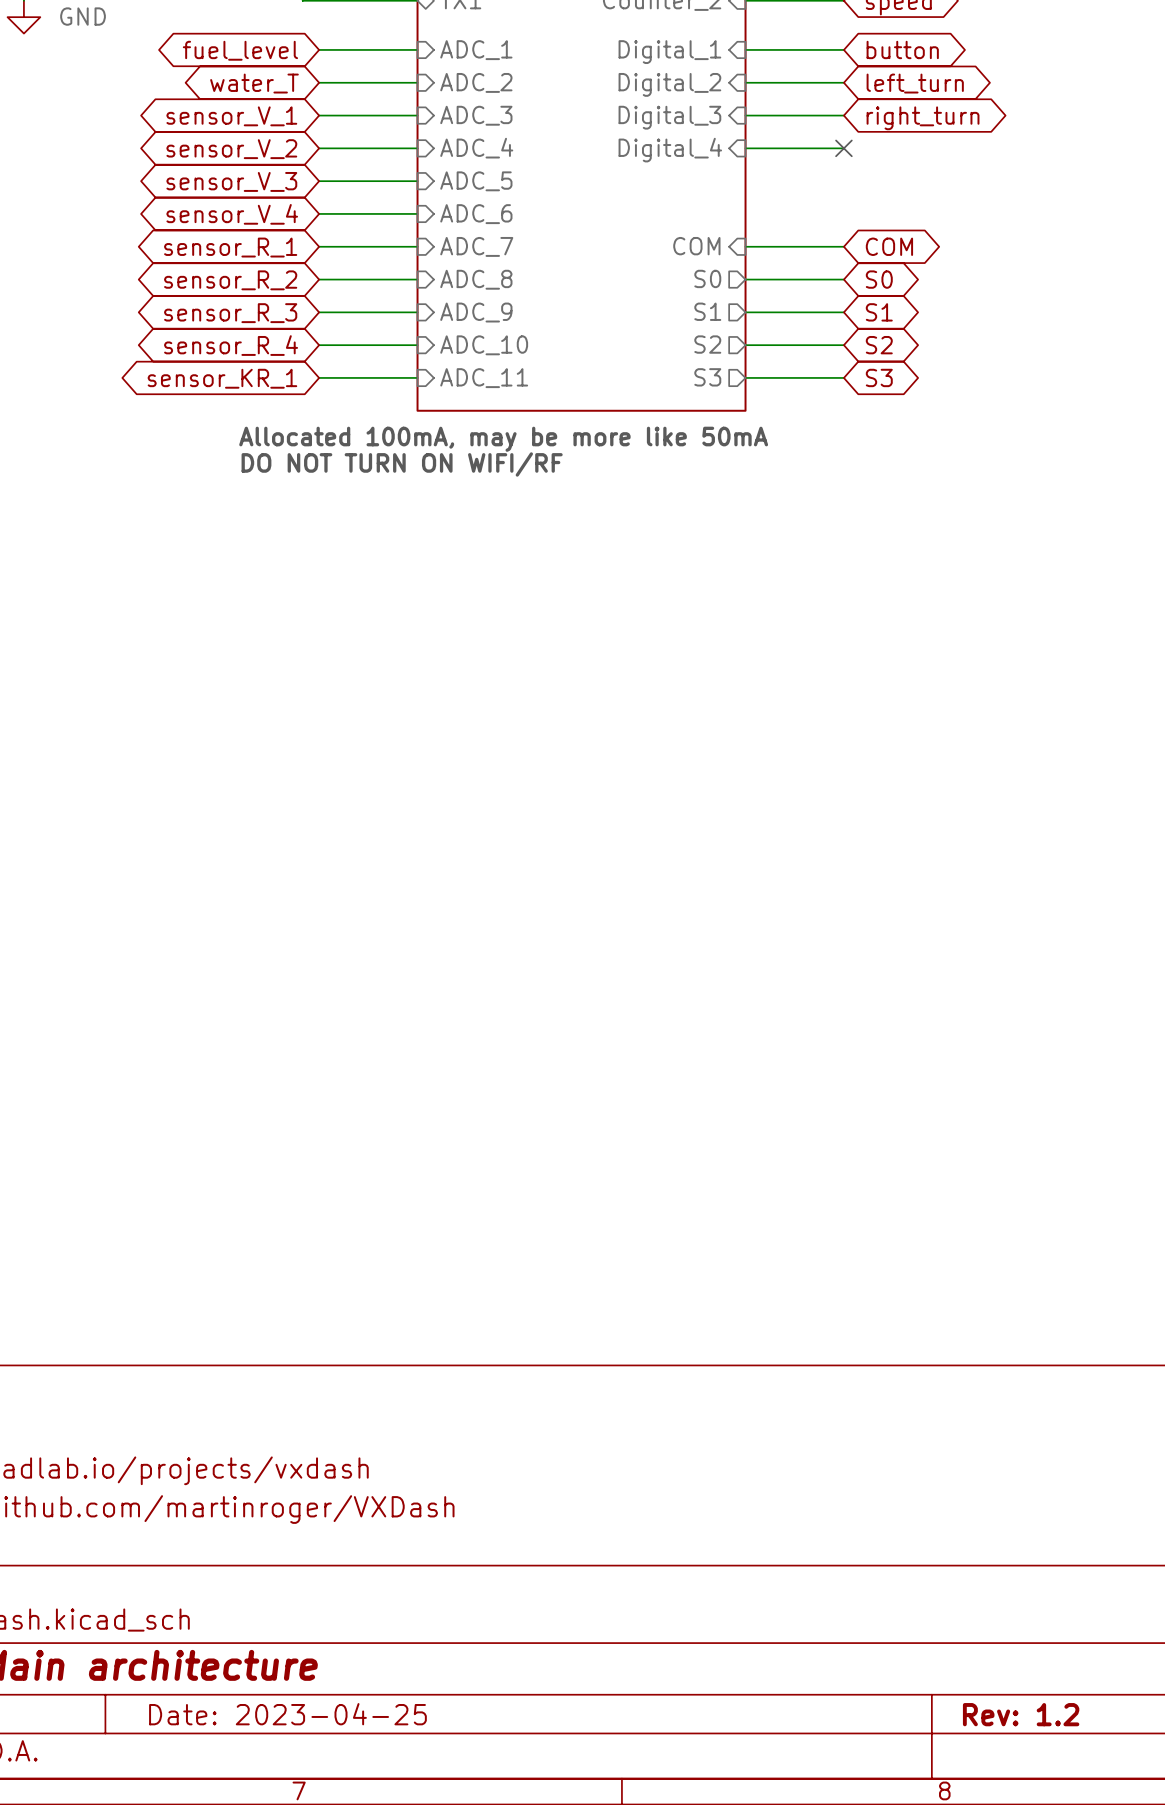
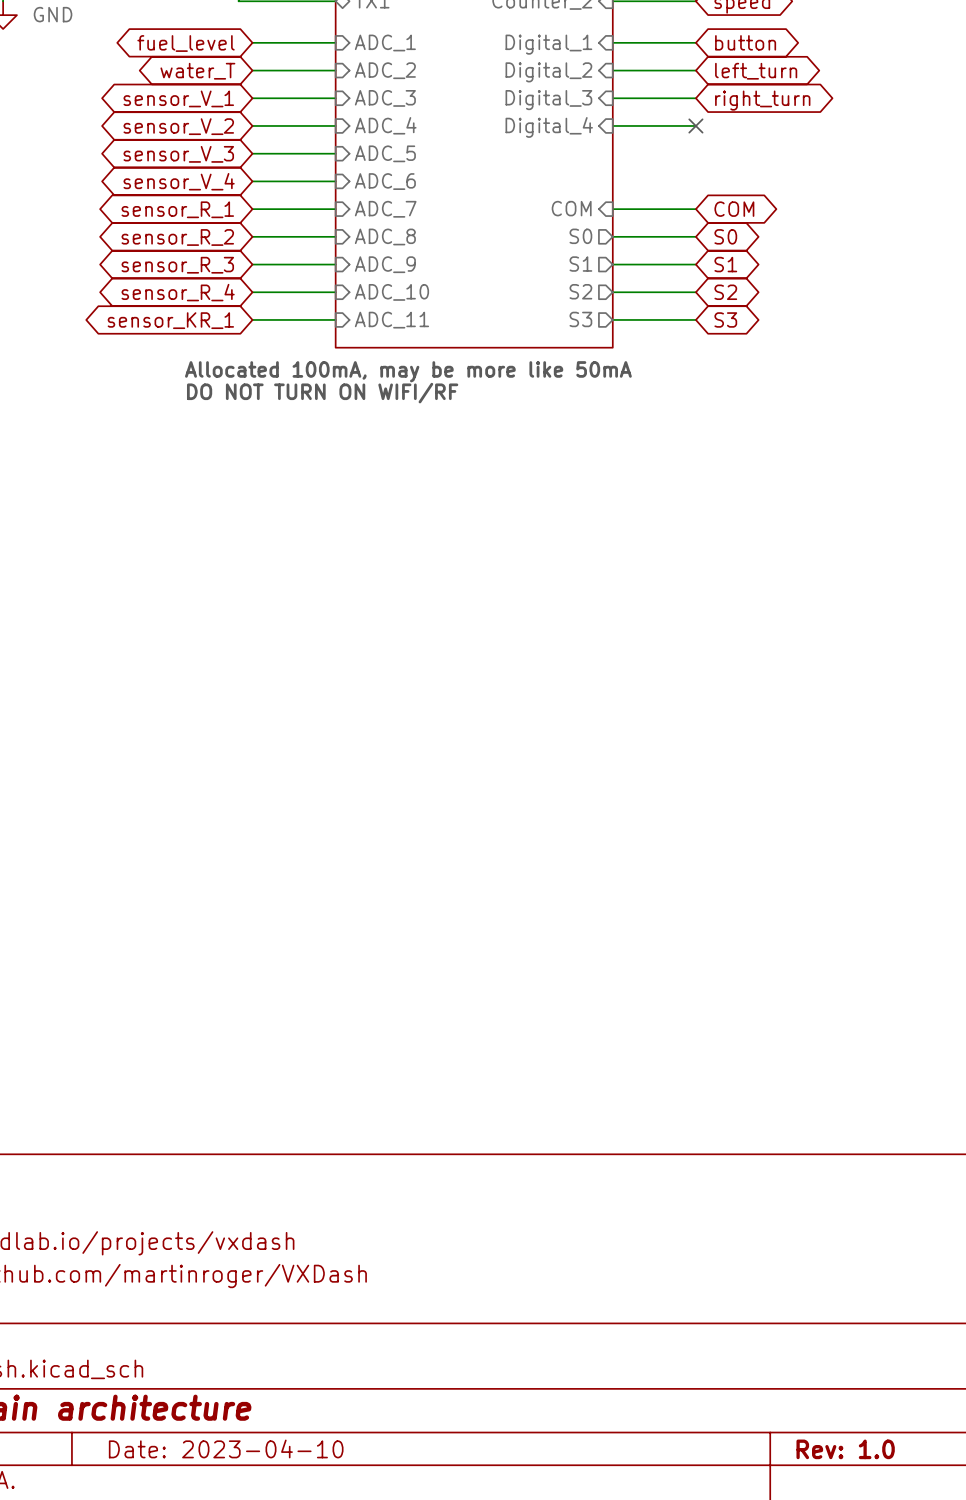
title block: Date: 2023-04-25 (287, 1714) -> Date: 2023-04-10 (226, 1448)
title block: Rev: 1.2 (1021, 1714) -> Rev: 1.0 (845, 1449)

